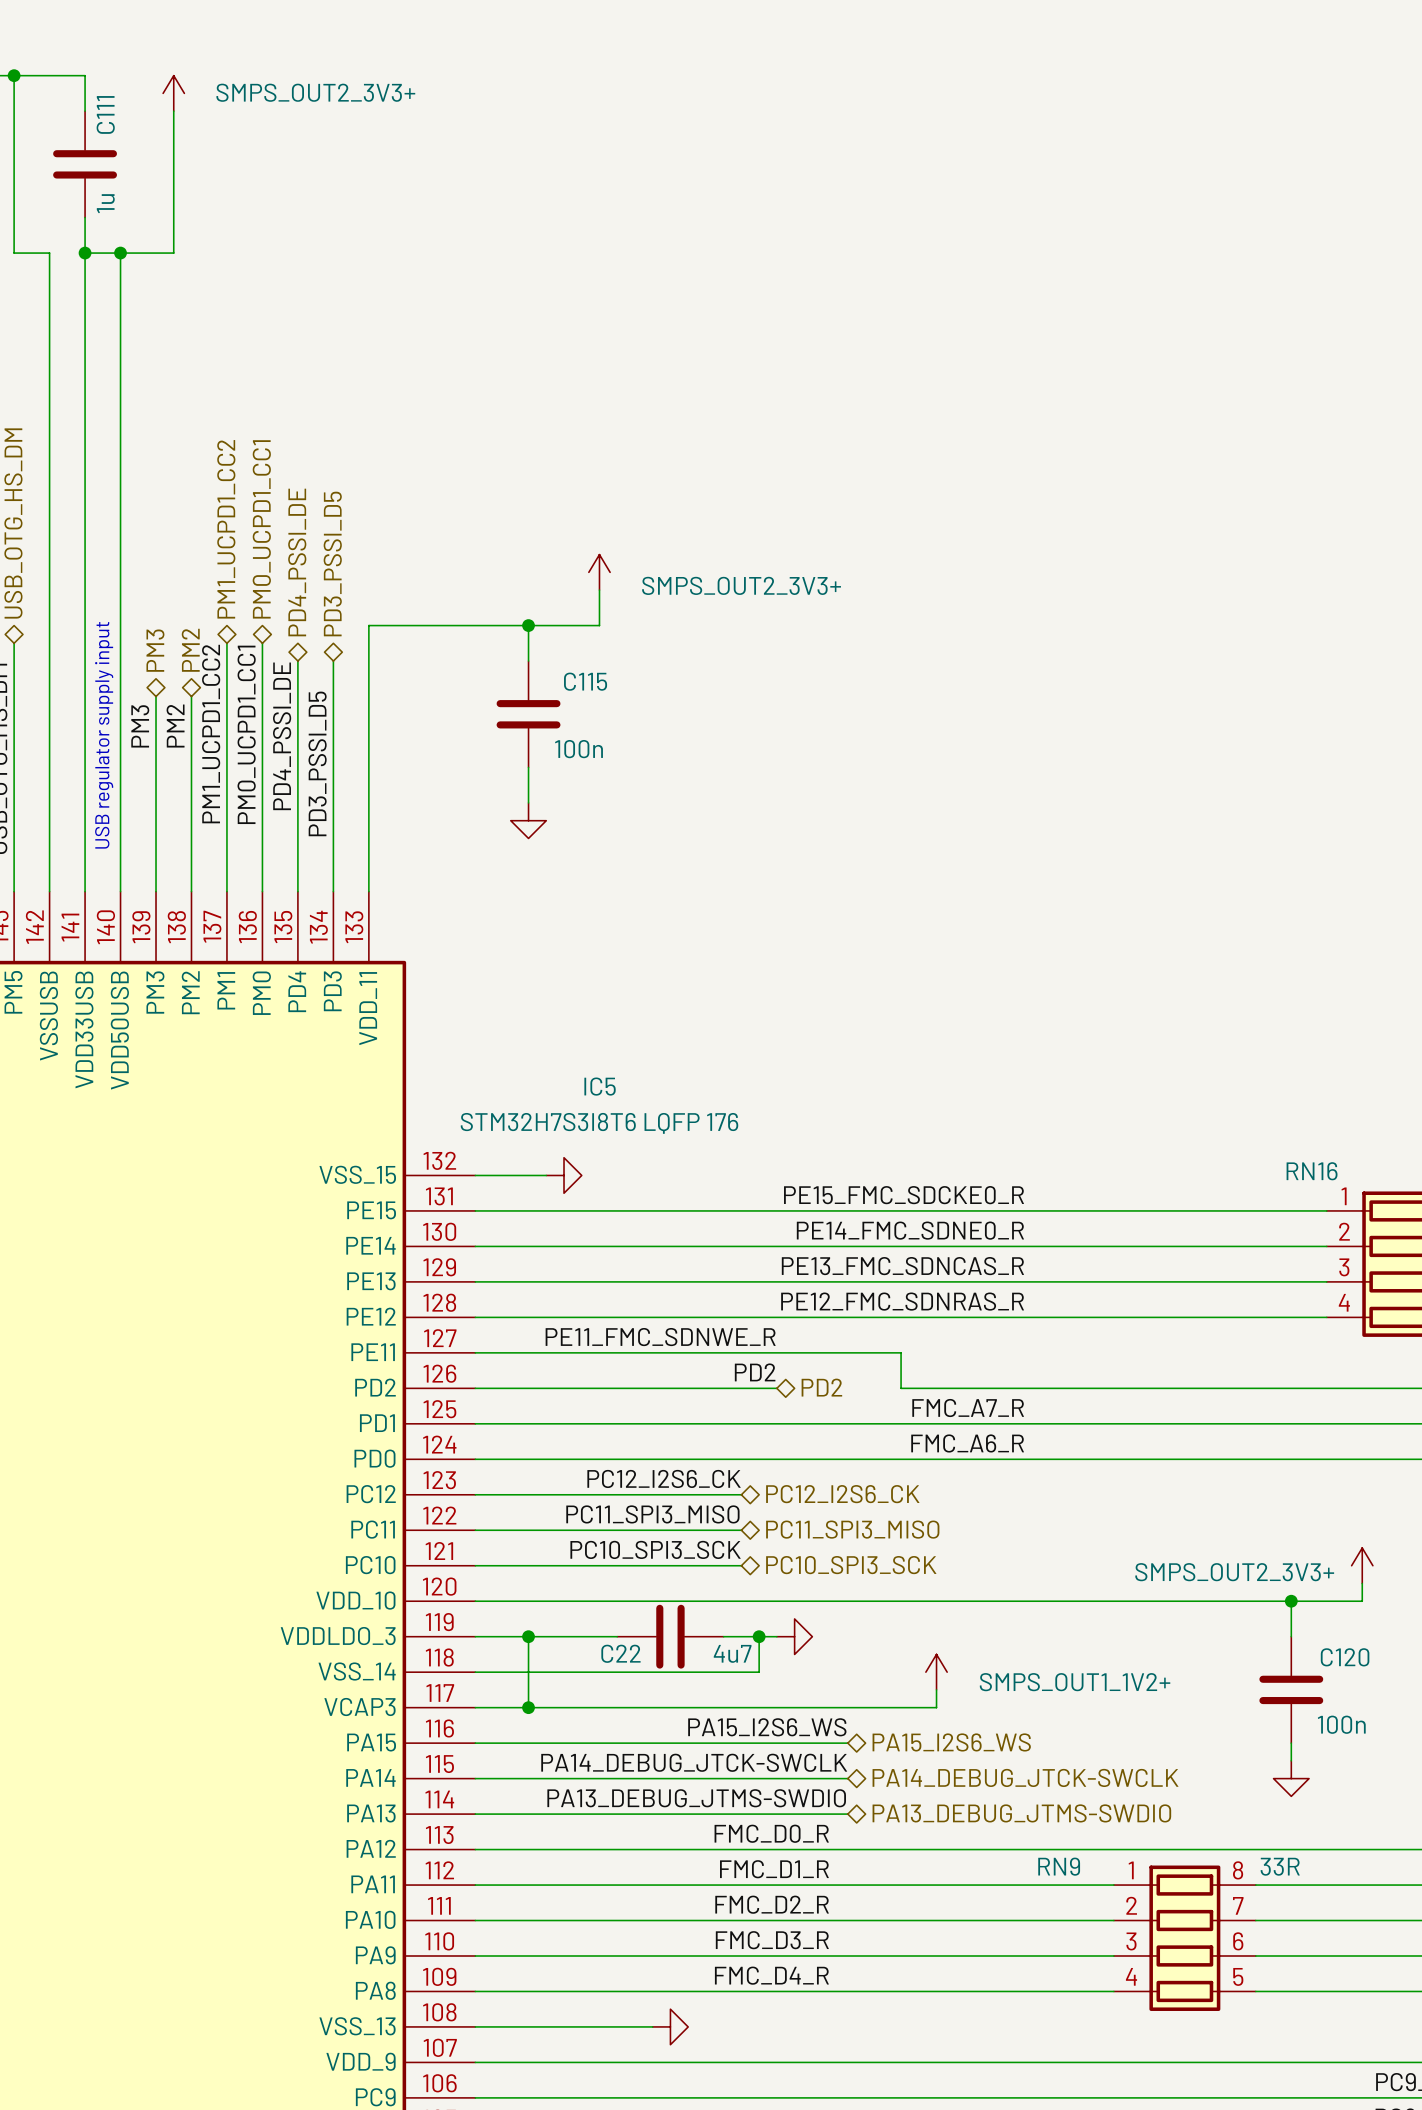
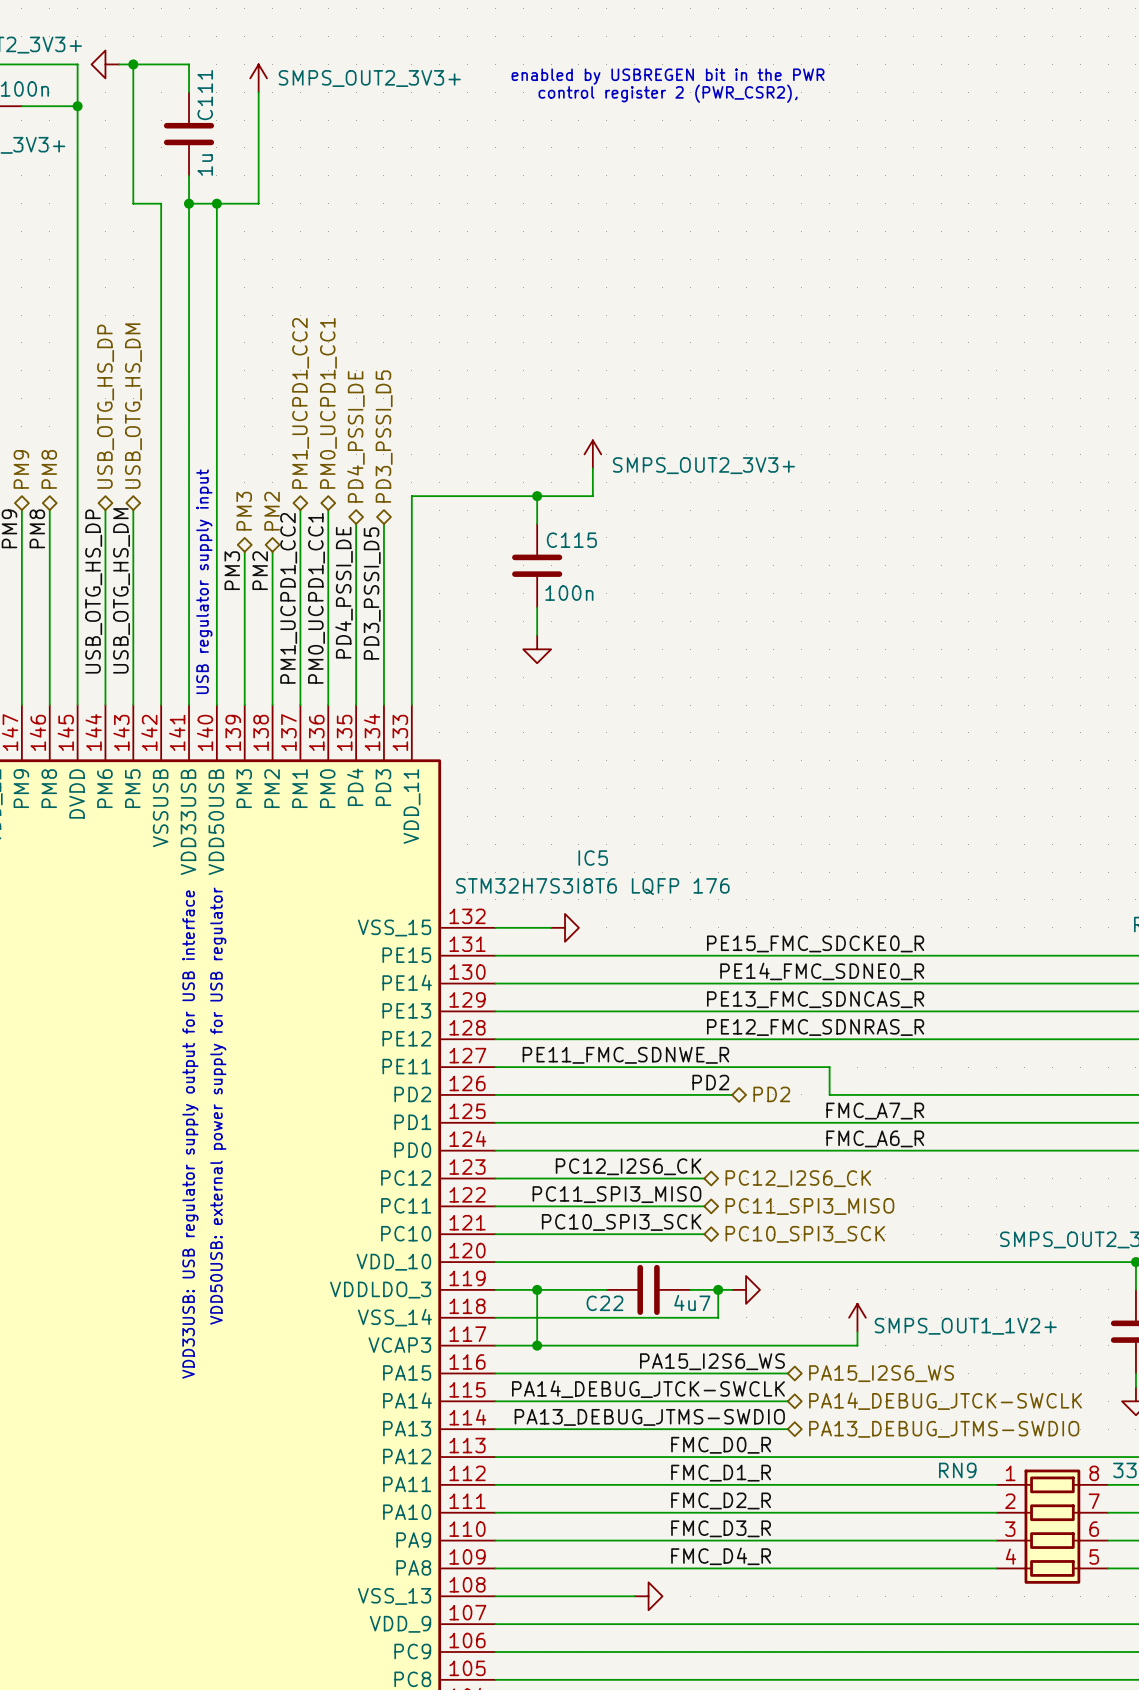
text: none -> enabled by USBREGEN bit in the PWR (668, 76)
text: none -> control register 2 (PWR_CSR2), (668, 93)
text: none -> VDD50USB: external power supply for USB regulator (218, 1106)
text: none -> VDD33USB: USB regulator supply output for USB interface (190, 1134)

